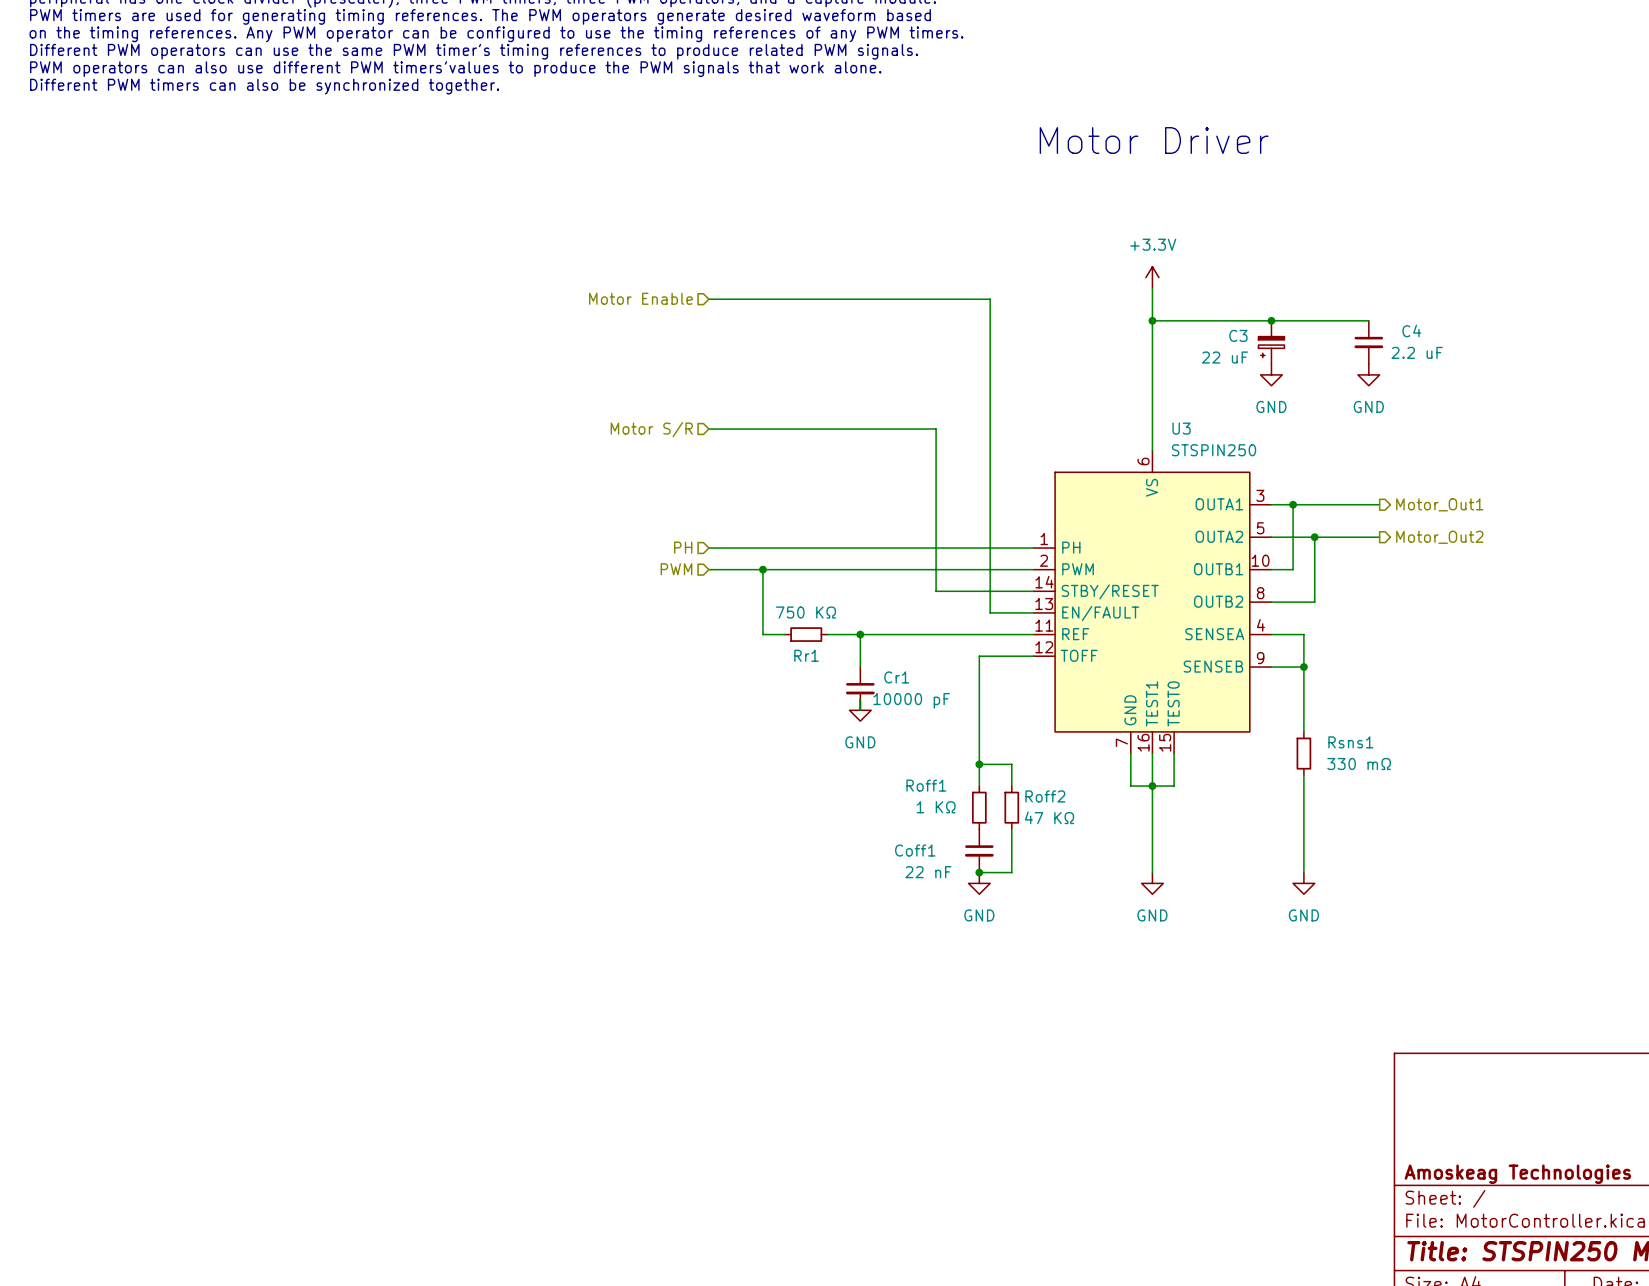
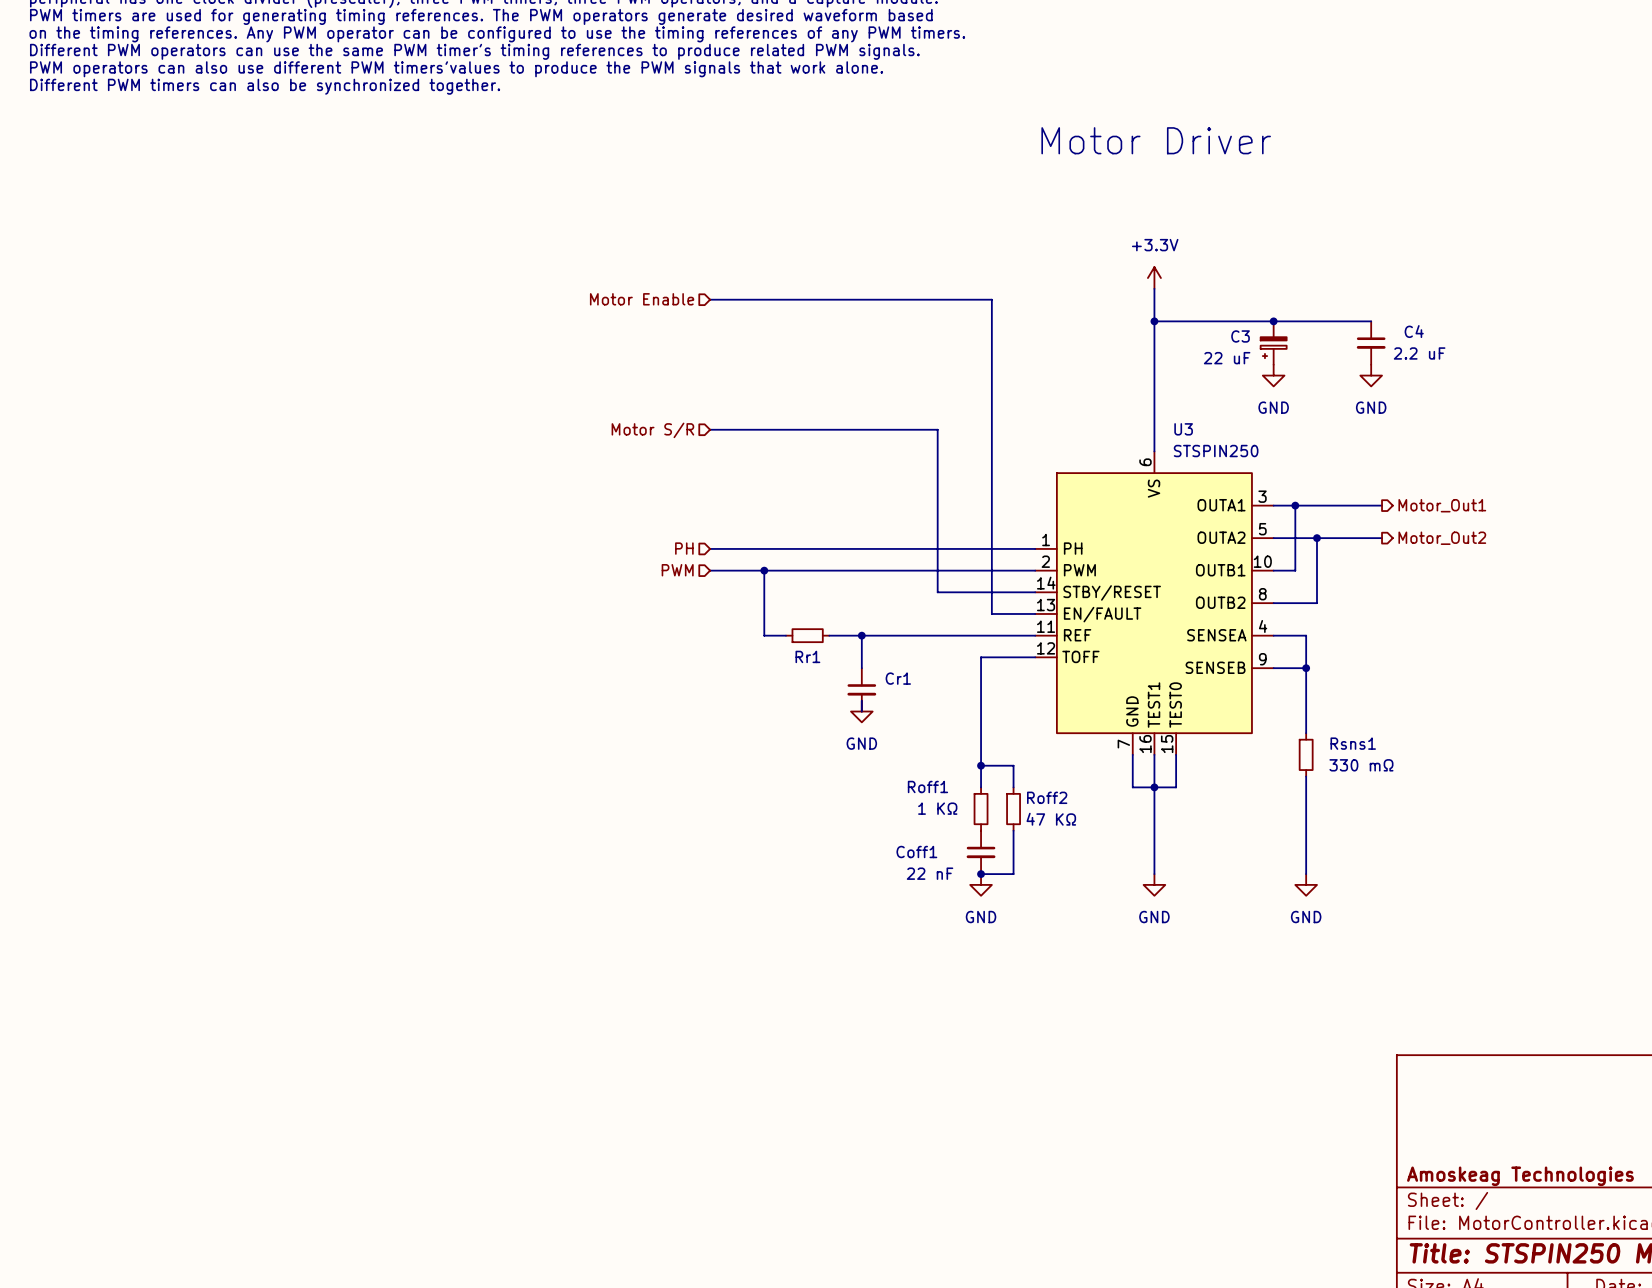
Rr1 value: 750 KΩ (805, 612) -> none
Cr1 value: 10000 pF (911, 700) -> none

